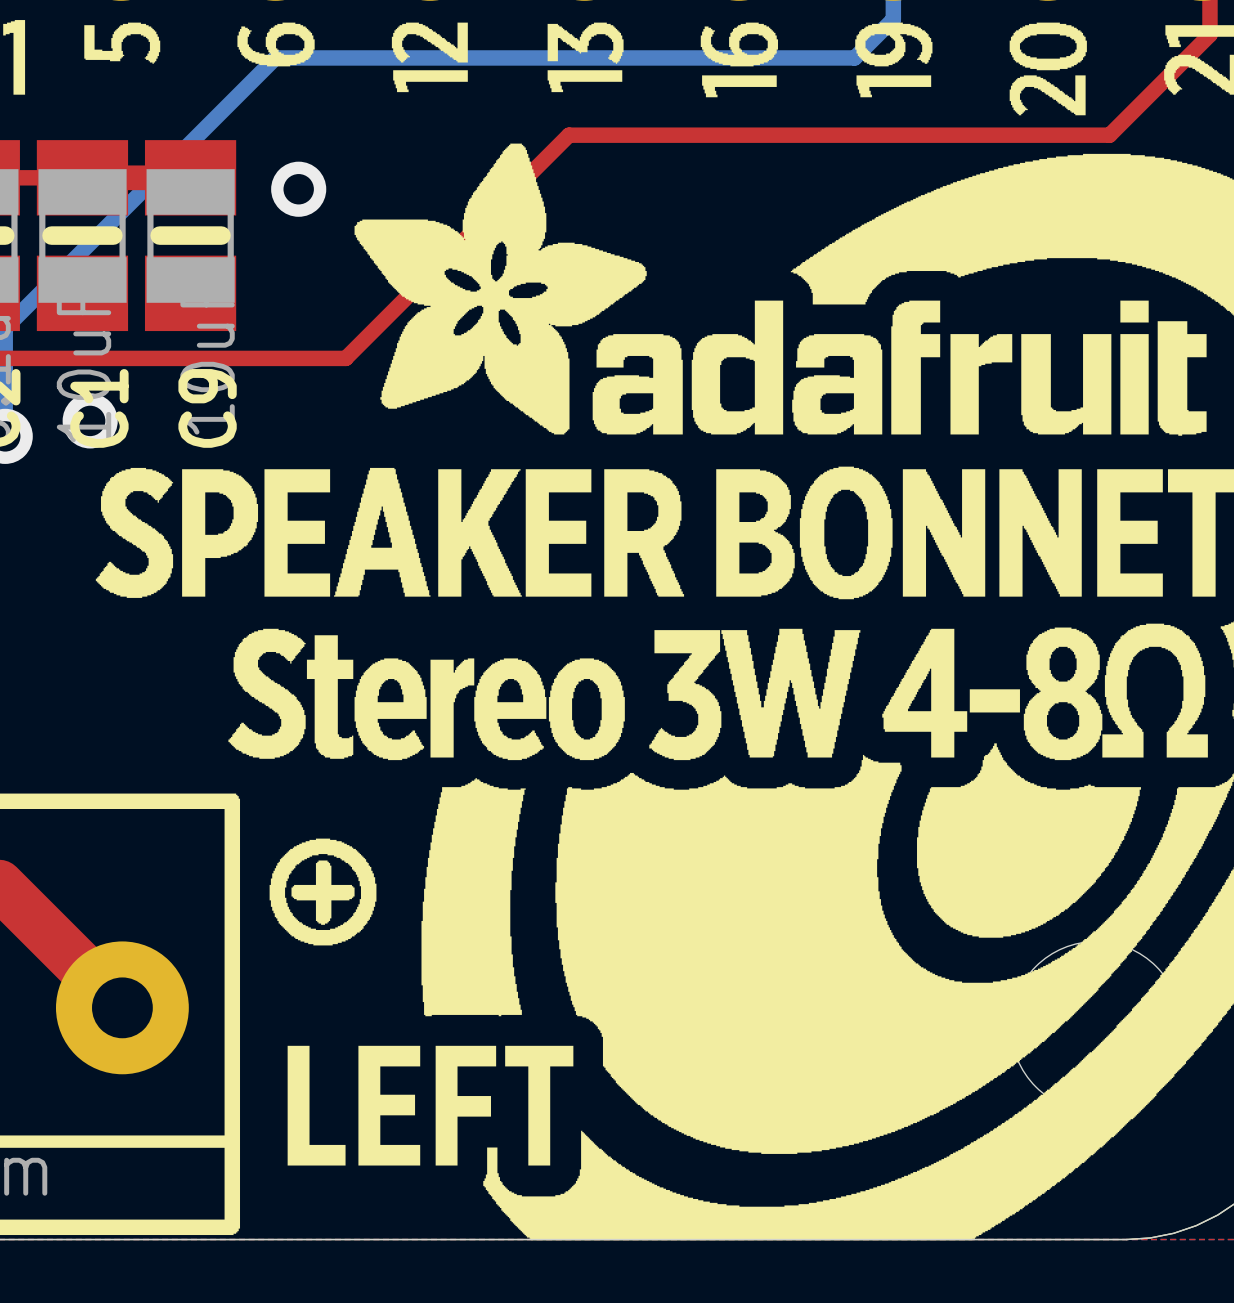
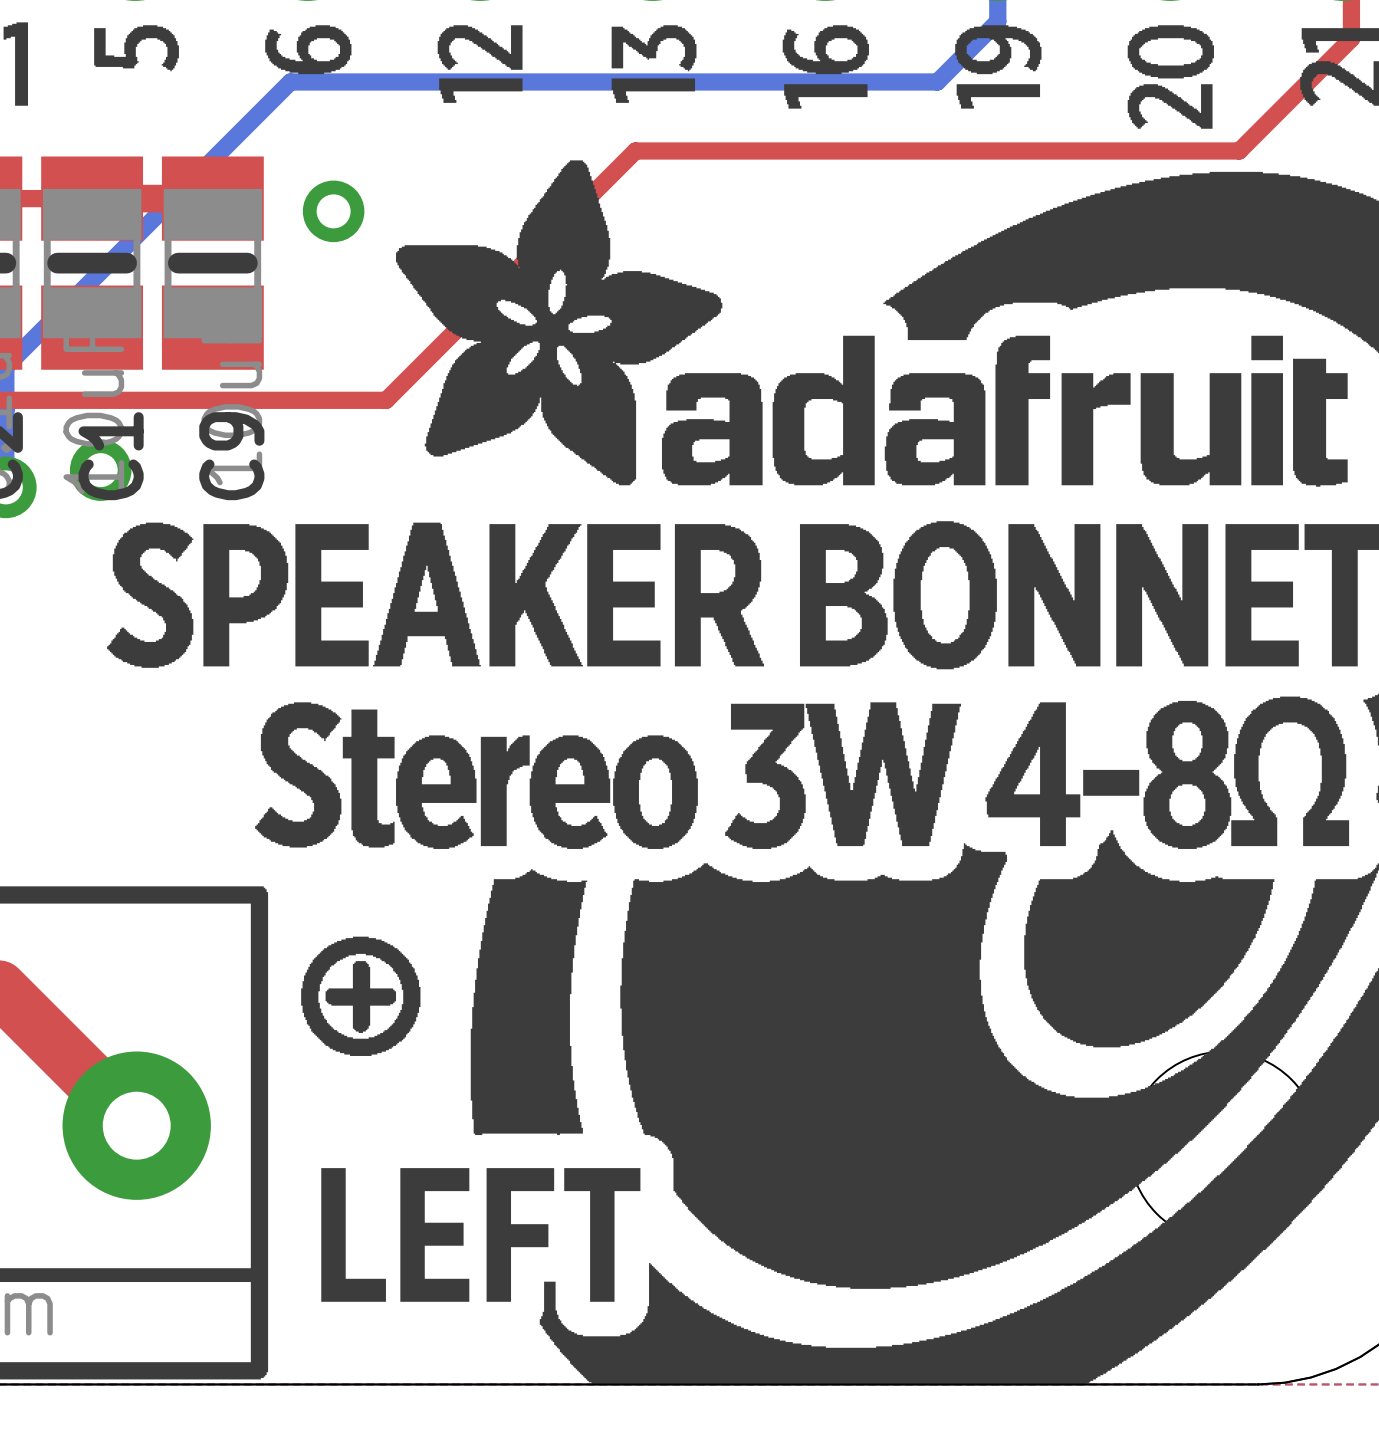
bottom track: (854, 57) (275, 57) (260, 73) -> (954, 64) (937, 81) (290, 81)

